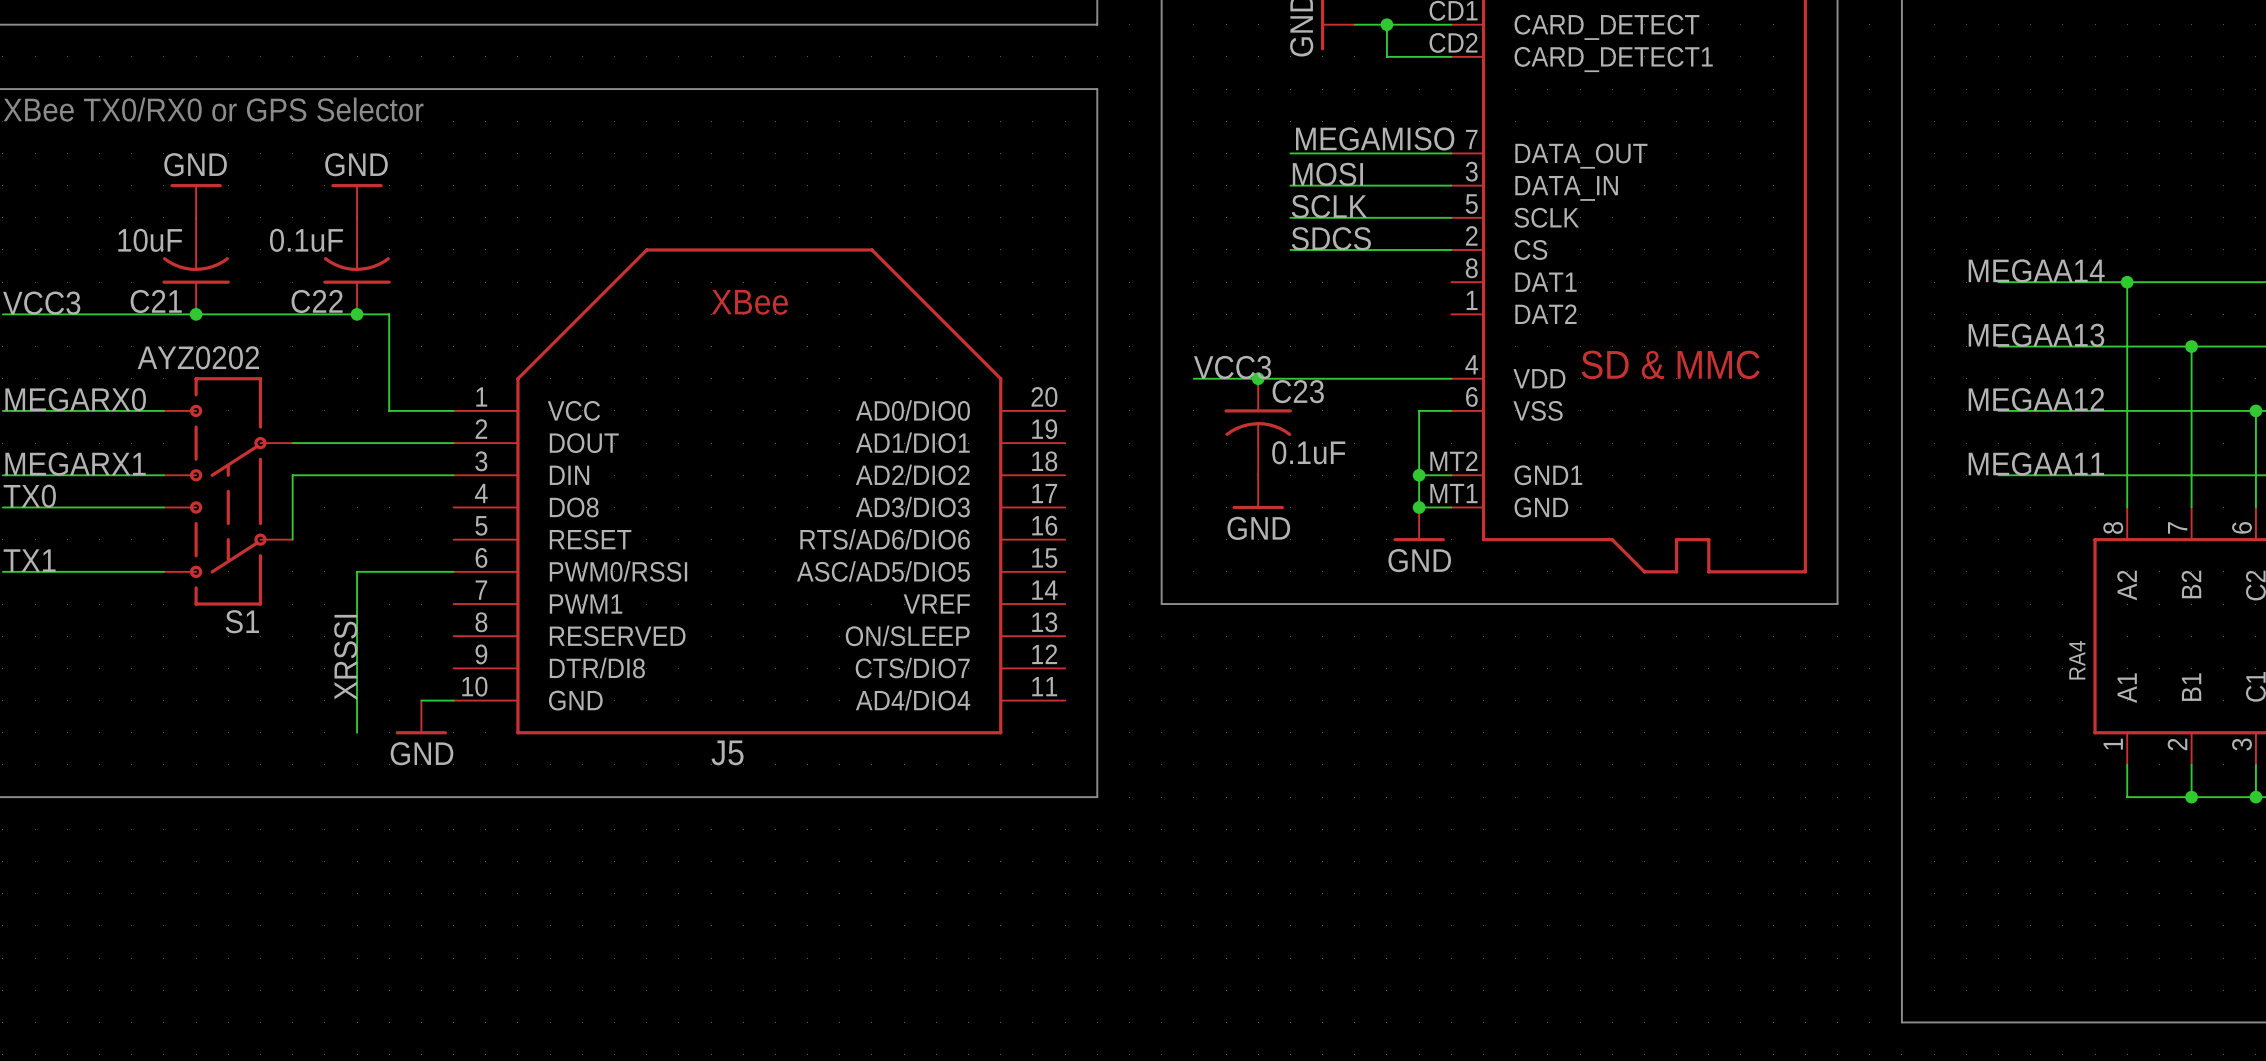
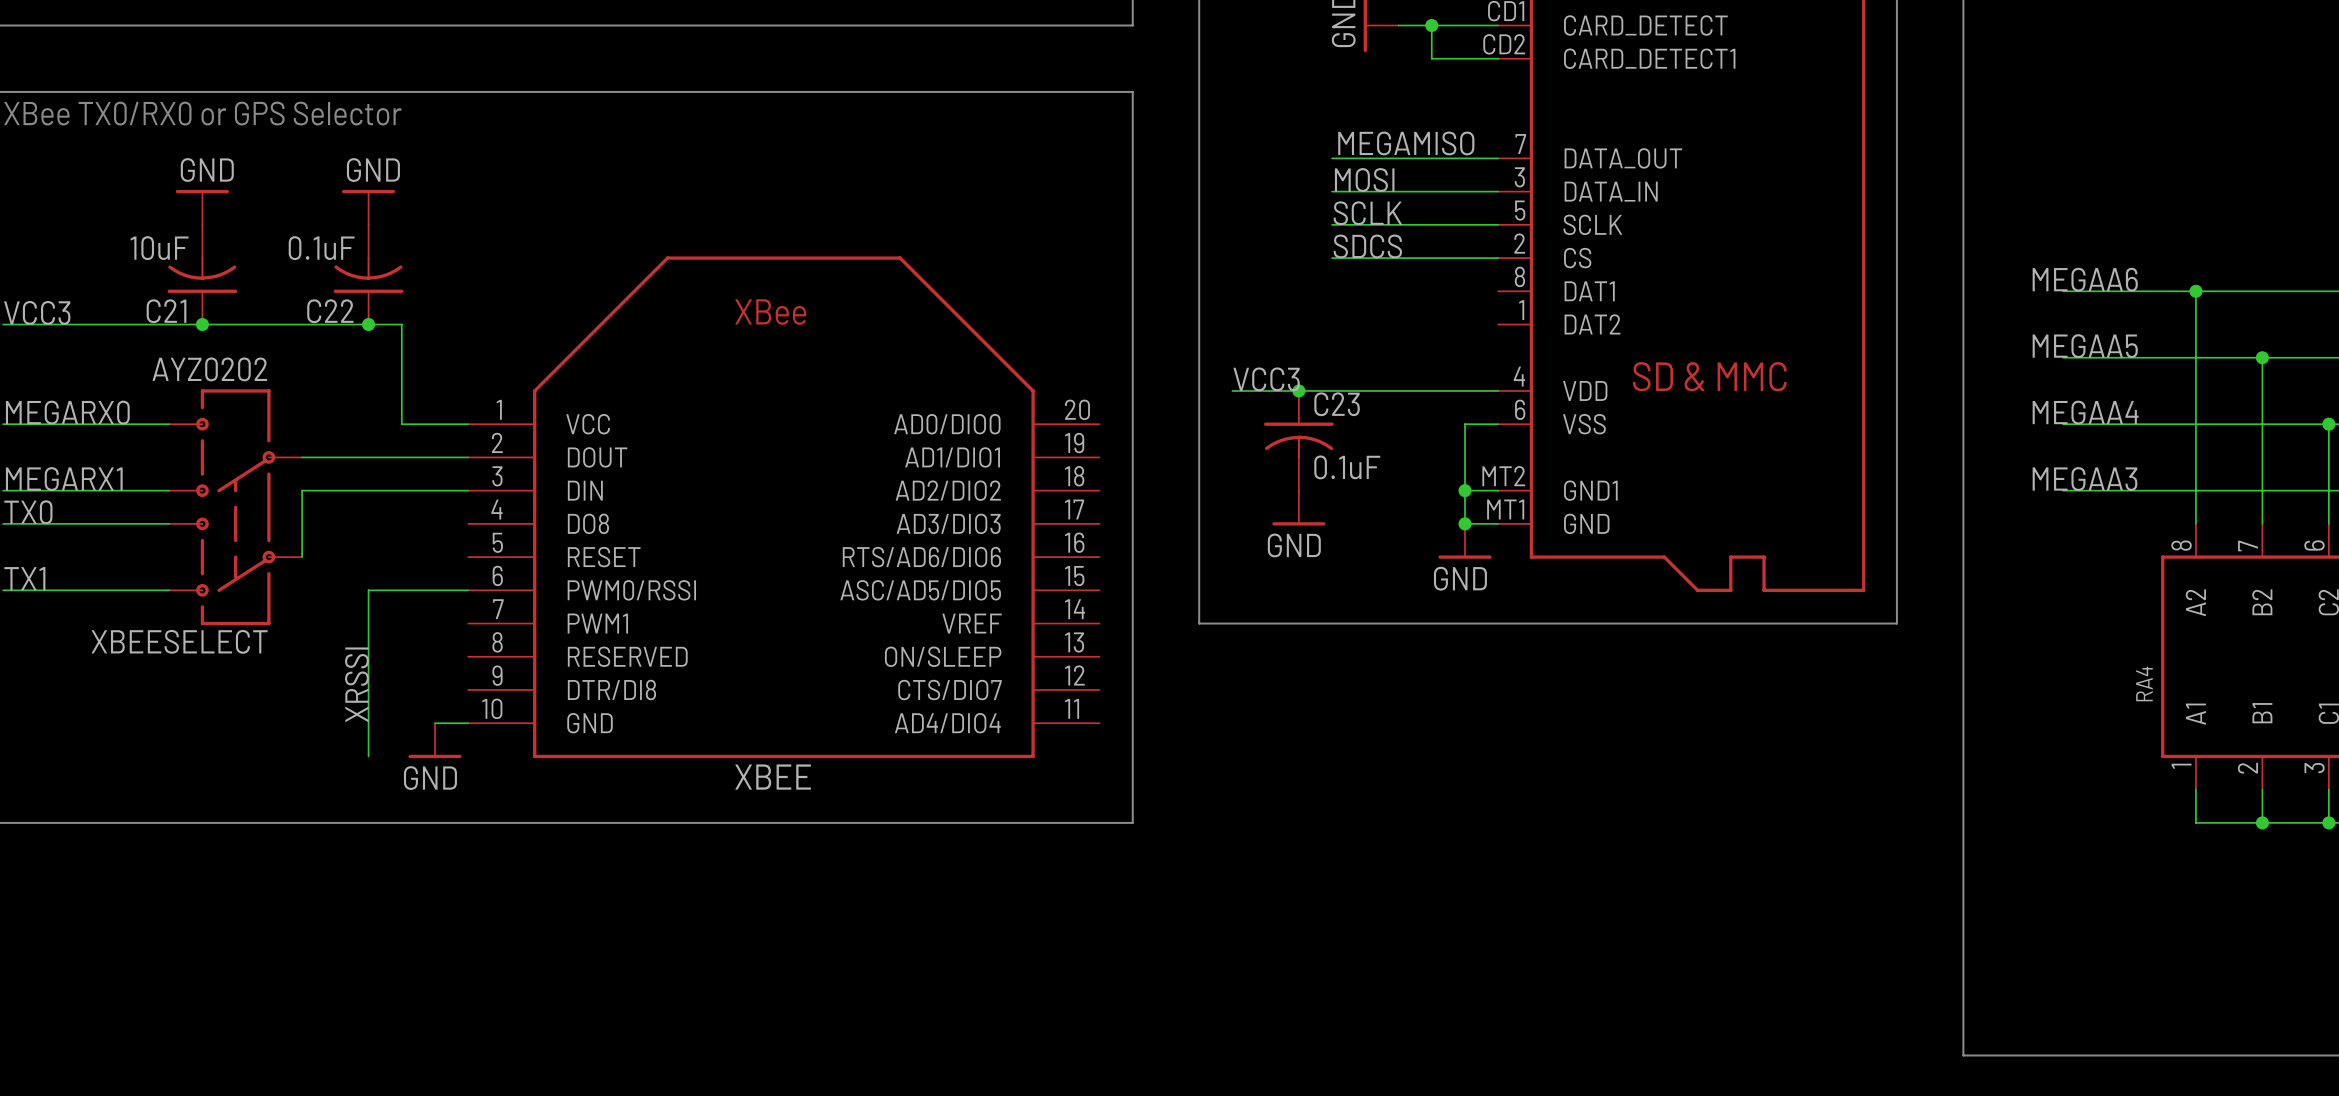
label: MEGAA14 (2036, 270) -> MEGAA6 (2085, 279)
label: MEGAA13 (2036, 335) -> MEGAA5 (2085, 346)
label: MEGAA12 (2036, 399) -> MEGAA4 (2085, 412)
label: MEGAA11 (2036, 464) -> MEGAA3 (2085, 479)
S1 name: S1 (242, 621) -> XBEESELECT (179, 641)
J5 name: J5 (727, 752) -> XBEE (773, 777)

